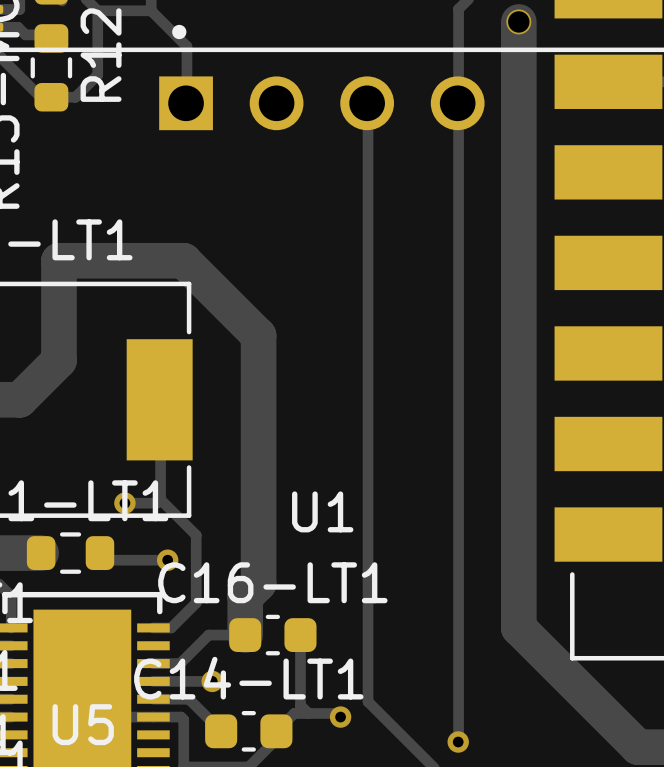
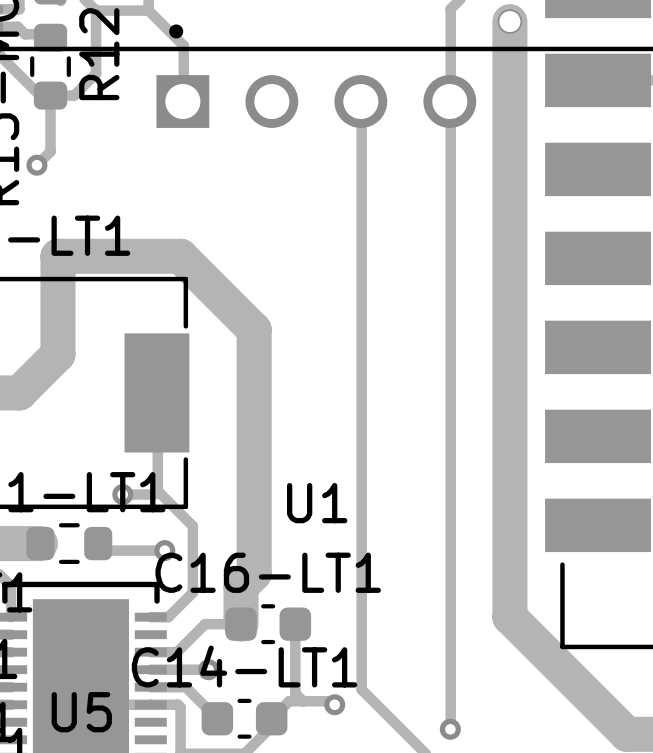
track: none -> (50, 95) (50, 151) (36, 165)
via: none -> (36, 165)

